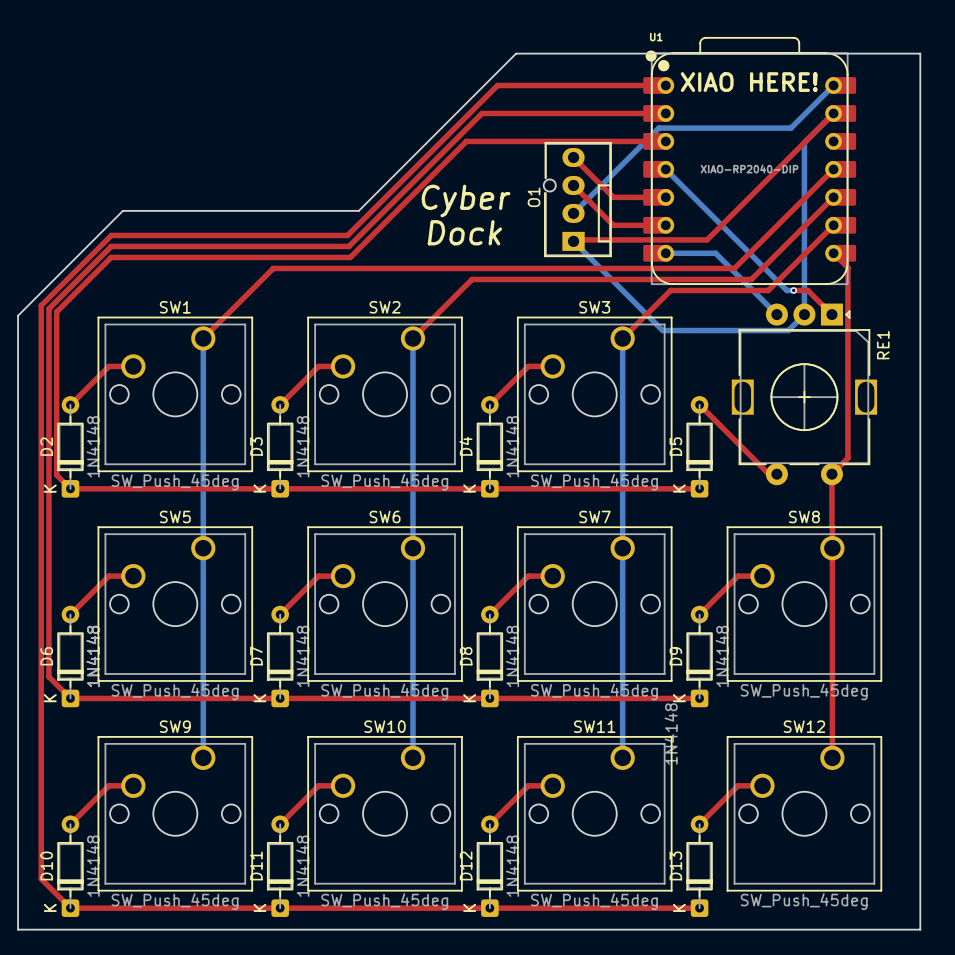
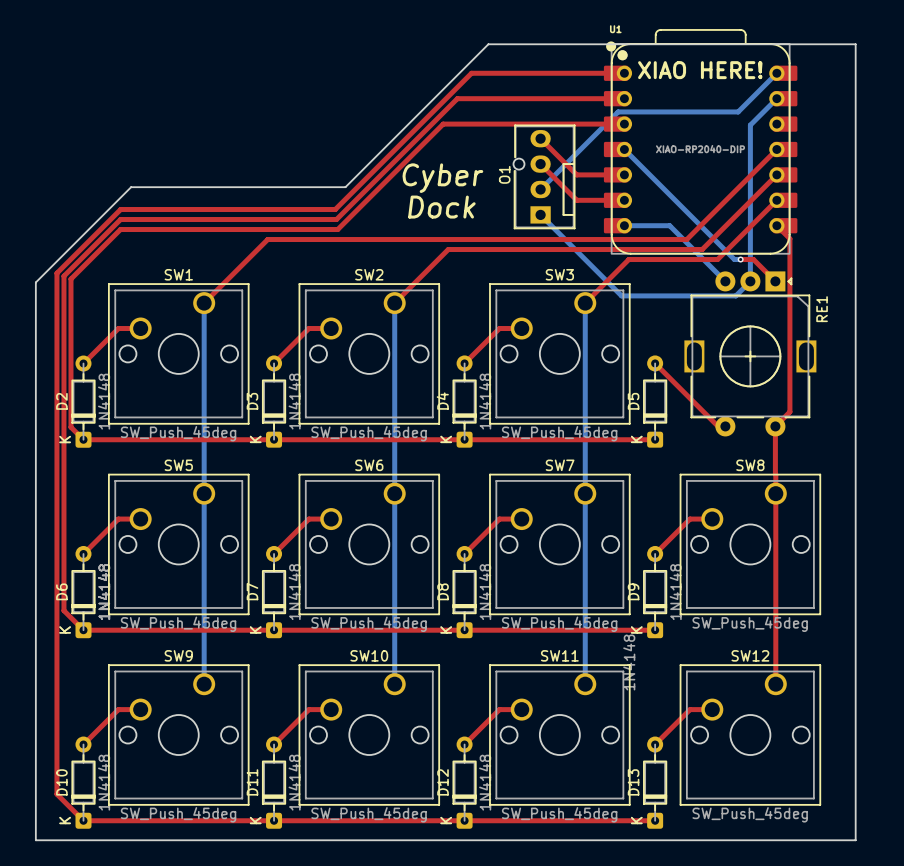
top track: (833, 113) (707, 239) (573, 241) -> none

